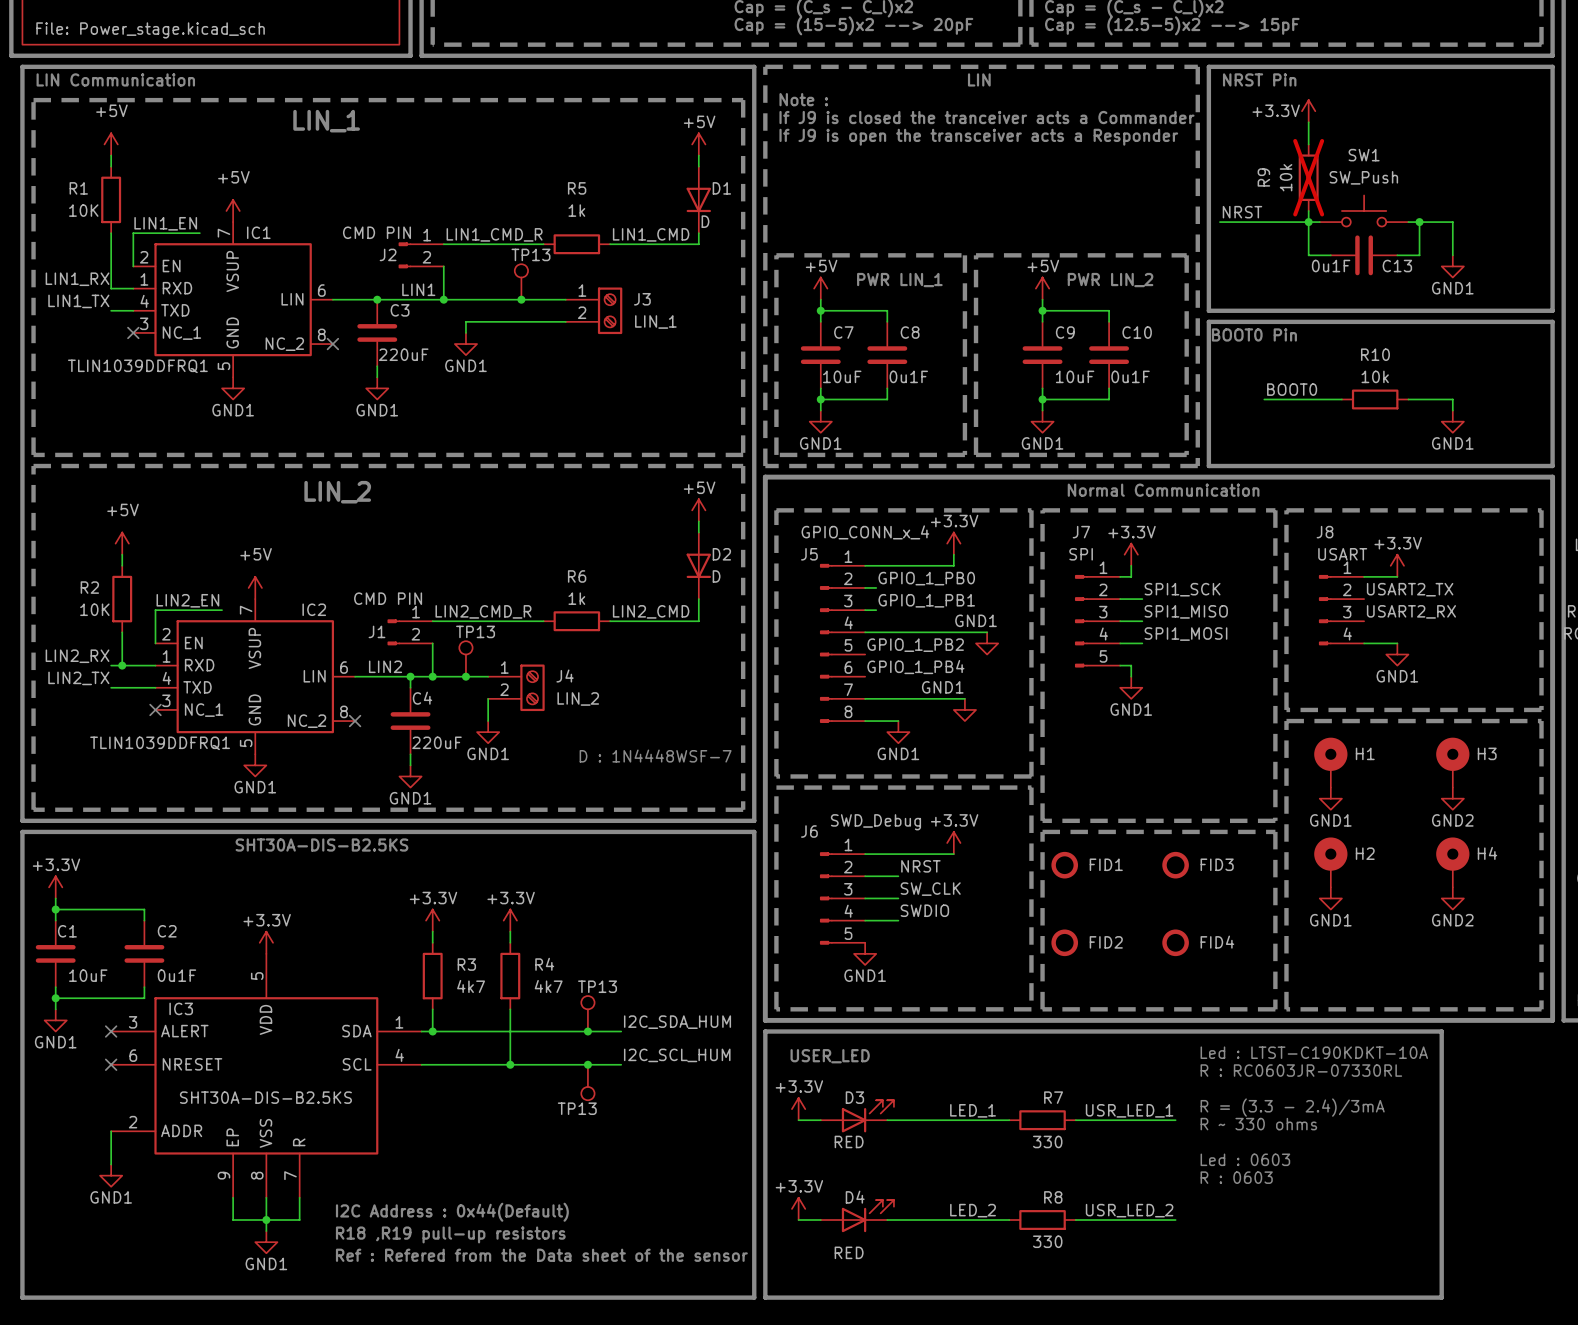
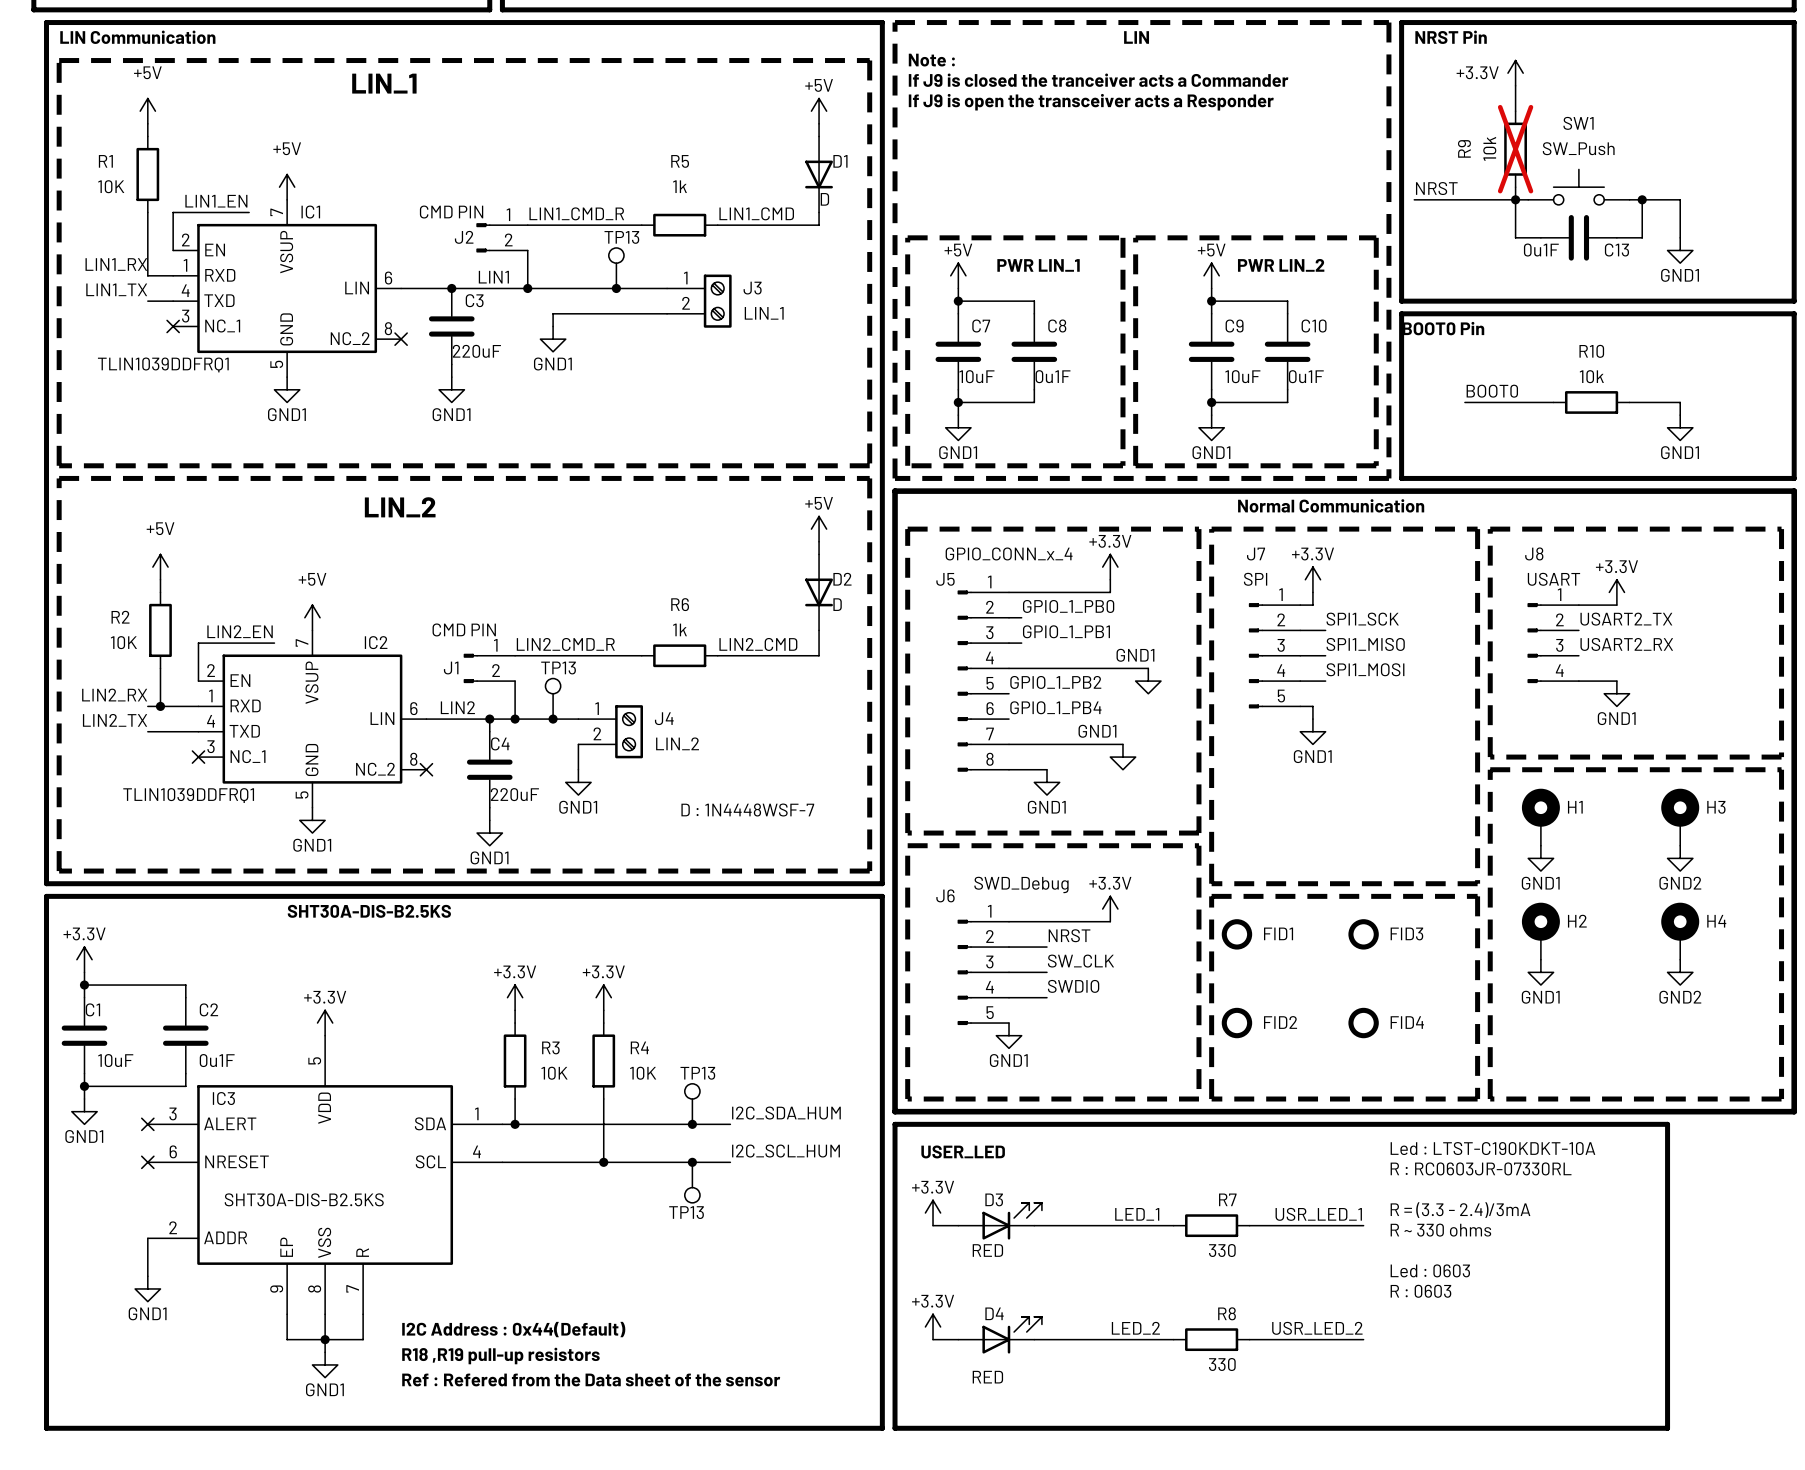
R3 value: 4k7 (471, 986) -> 10K (554, 1073)
R4 value: 4k7 (548, 986) -> 10K (643, 1073)

